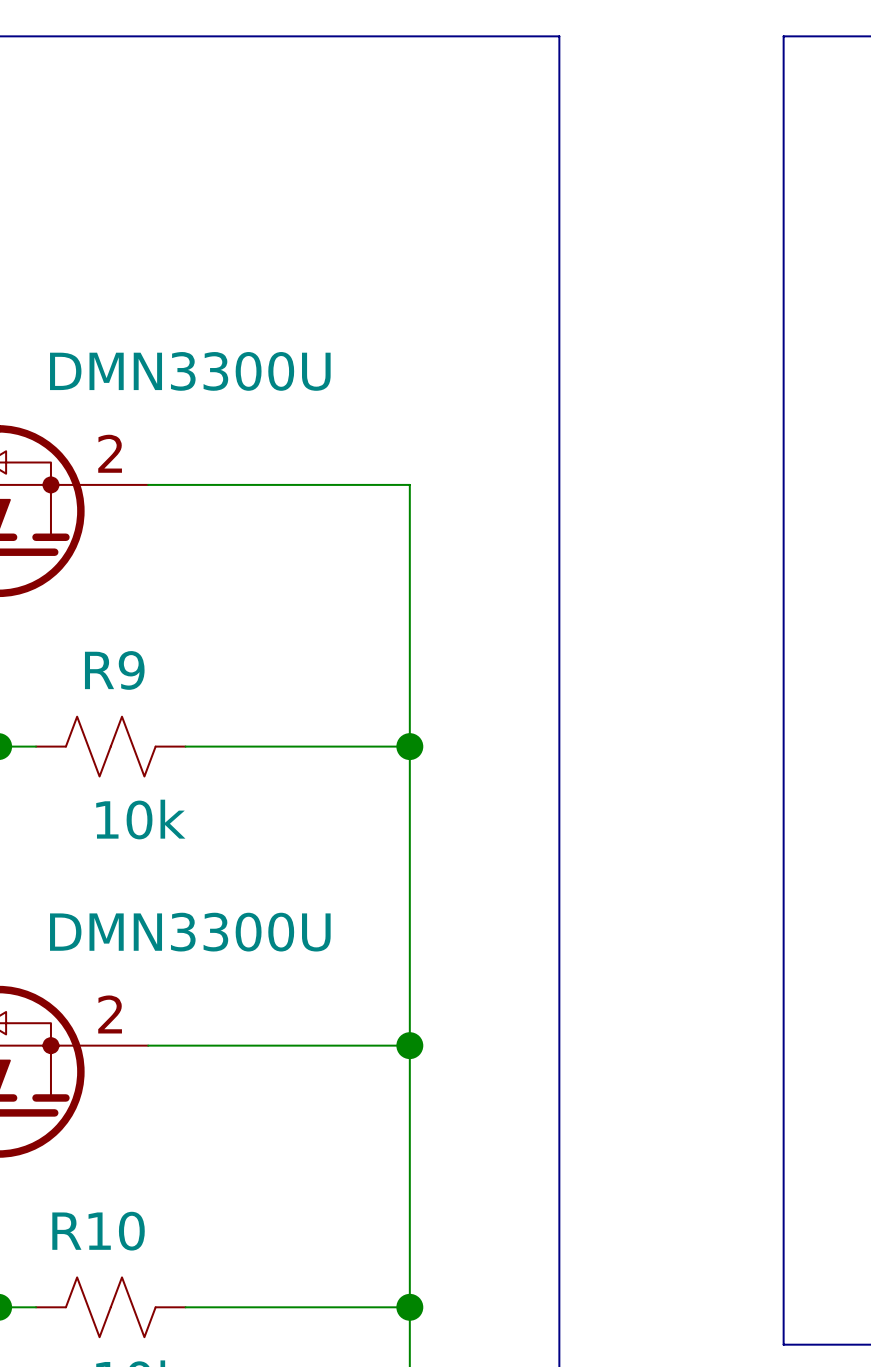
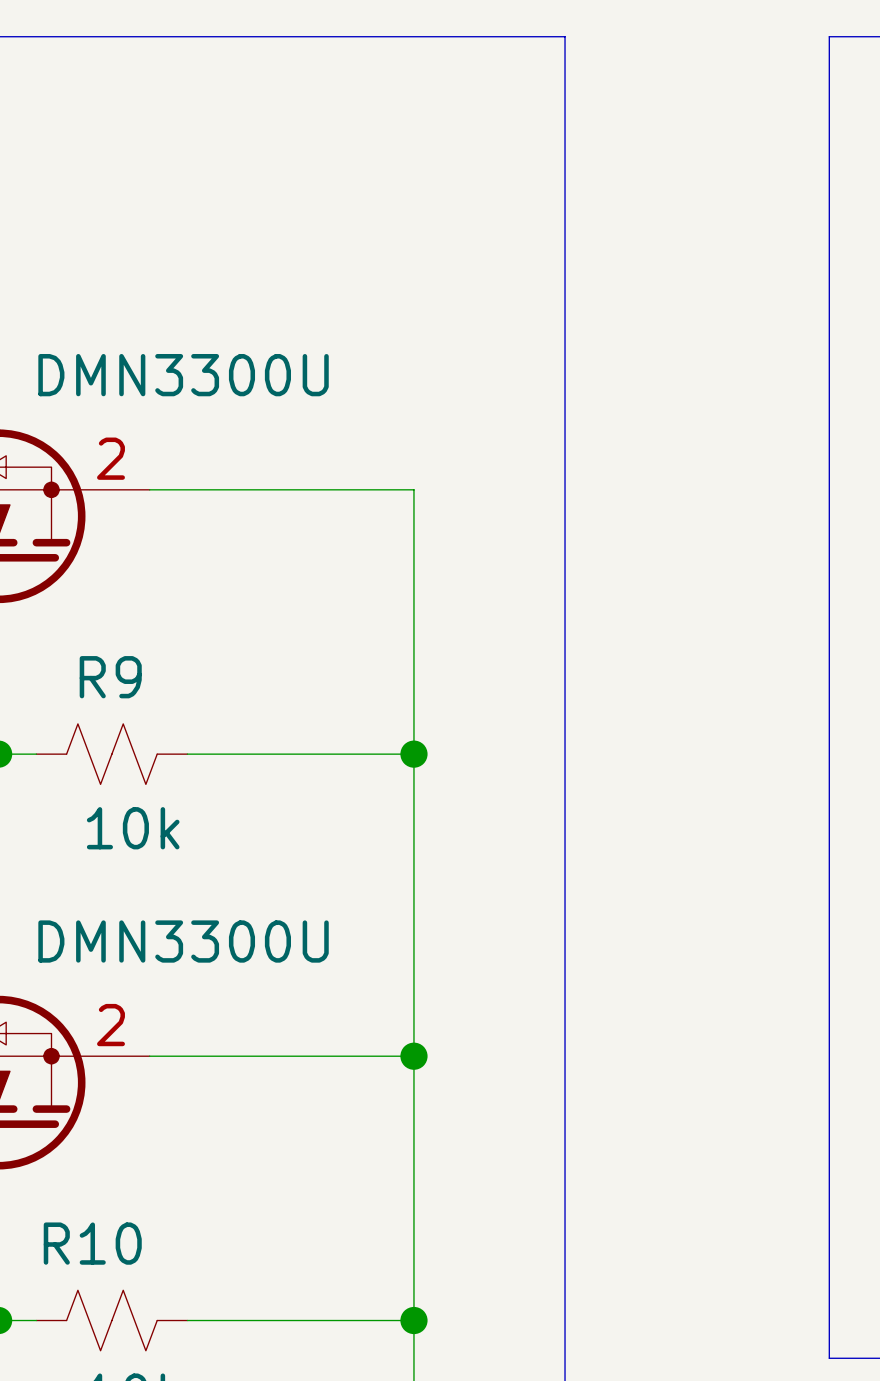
line: (821, 36) (783, 36) (783, 1344) (821, 1344) -> (829, 36) (829, 1358)

